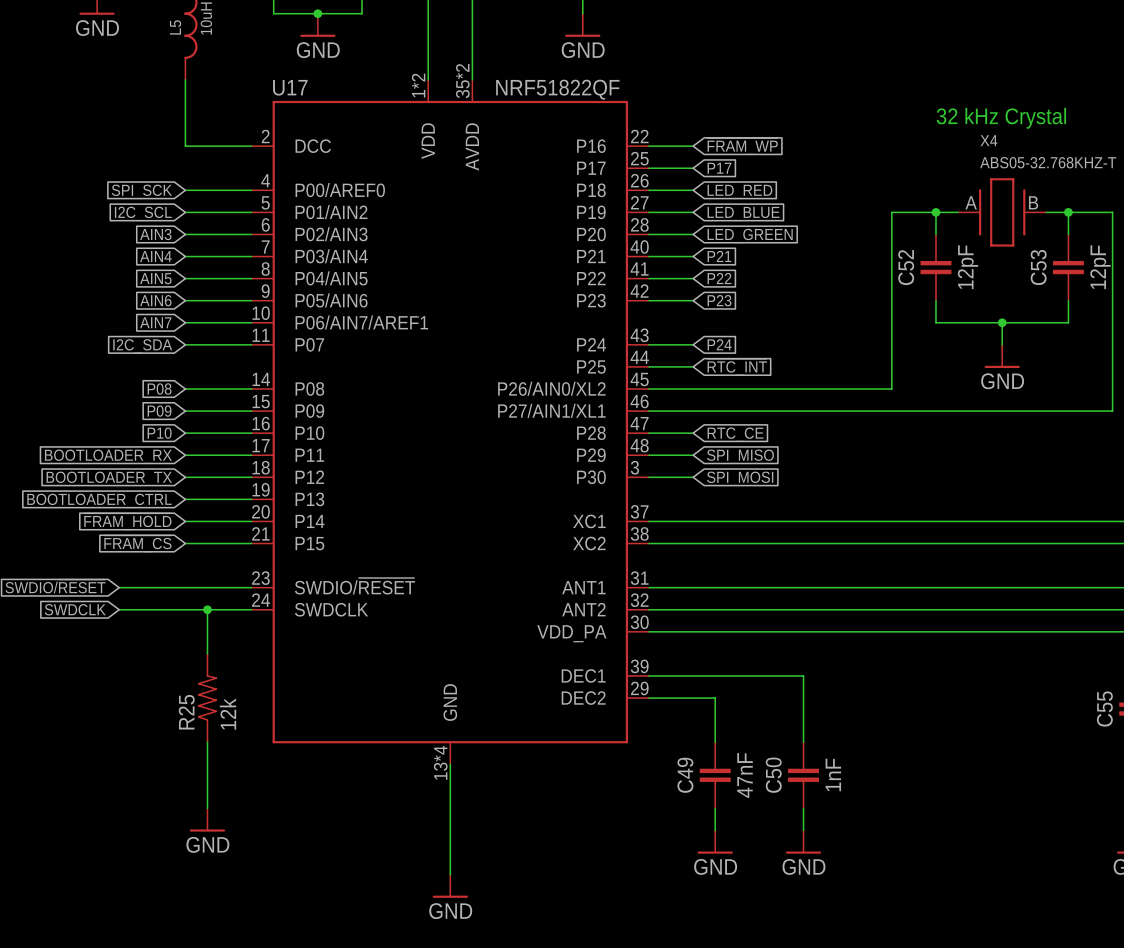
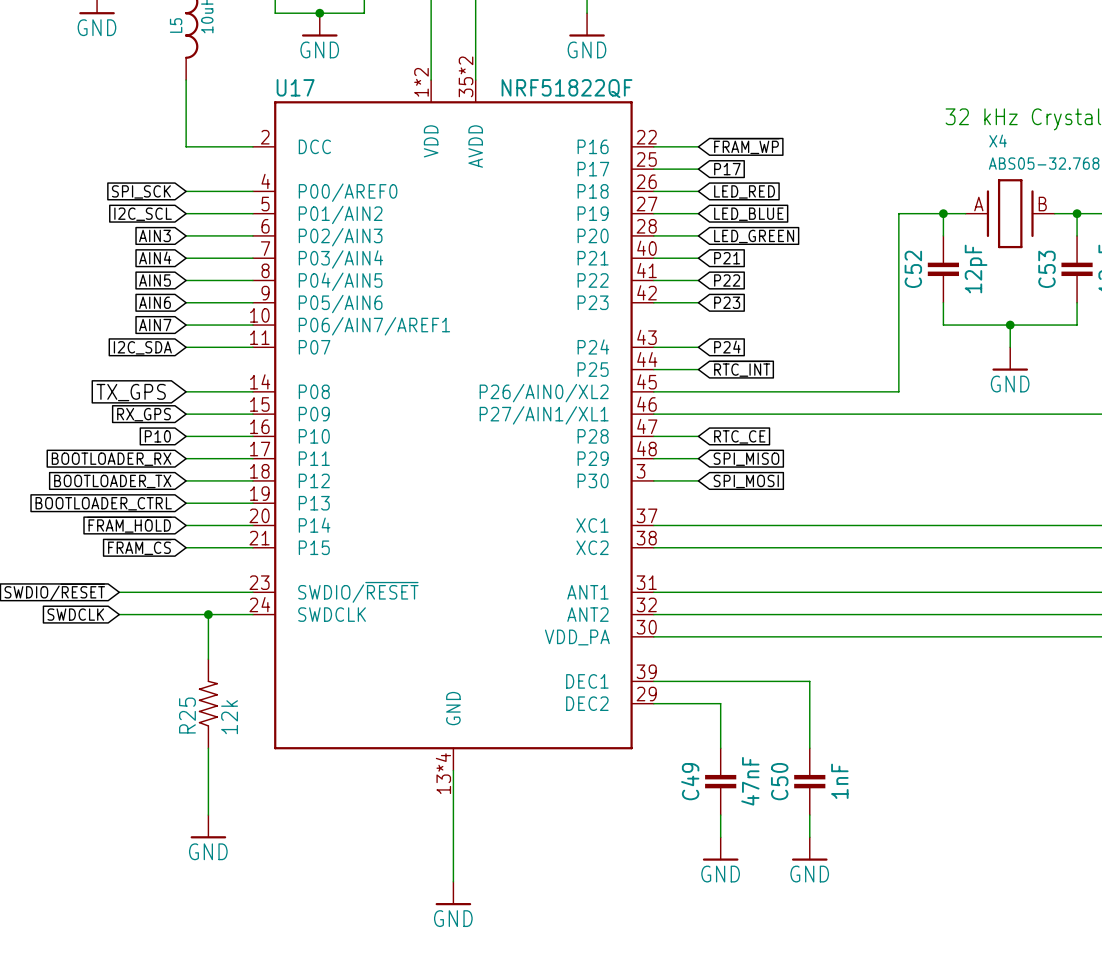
global label: P08 (159, 388) -> TX_GPS (131, 392)
global label: P09 (159, 411) -> RX_GPS (144, 414)

